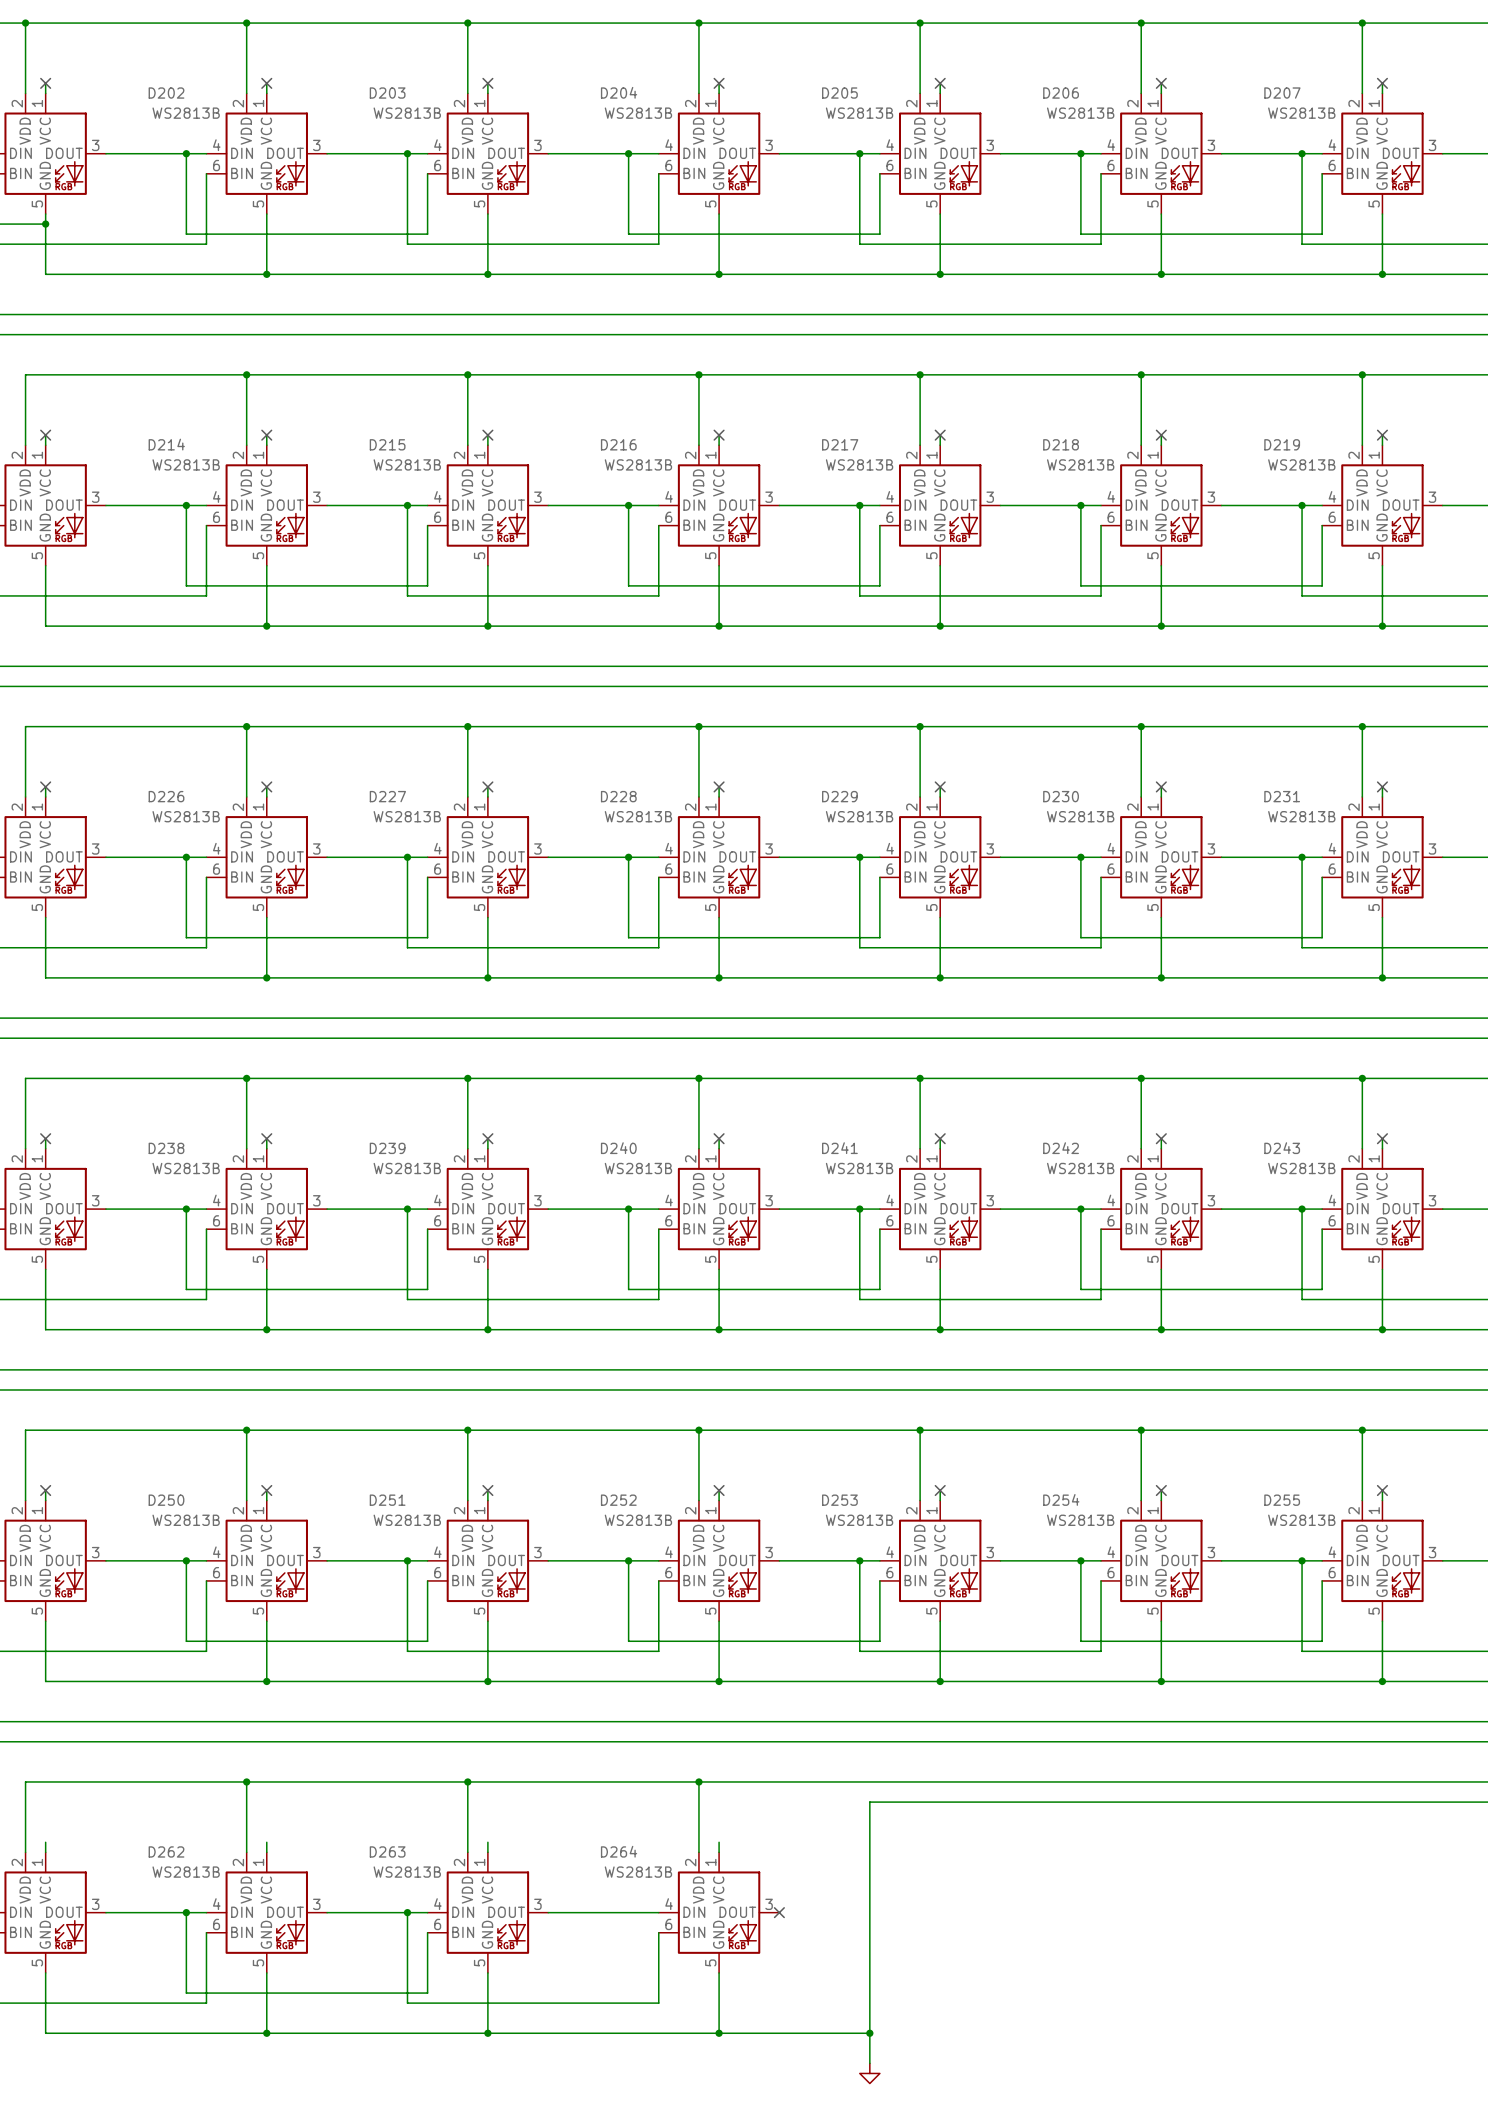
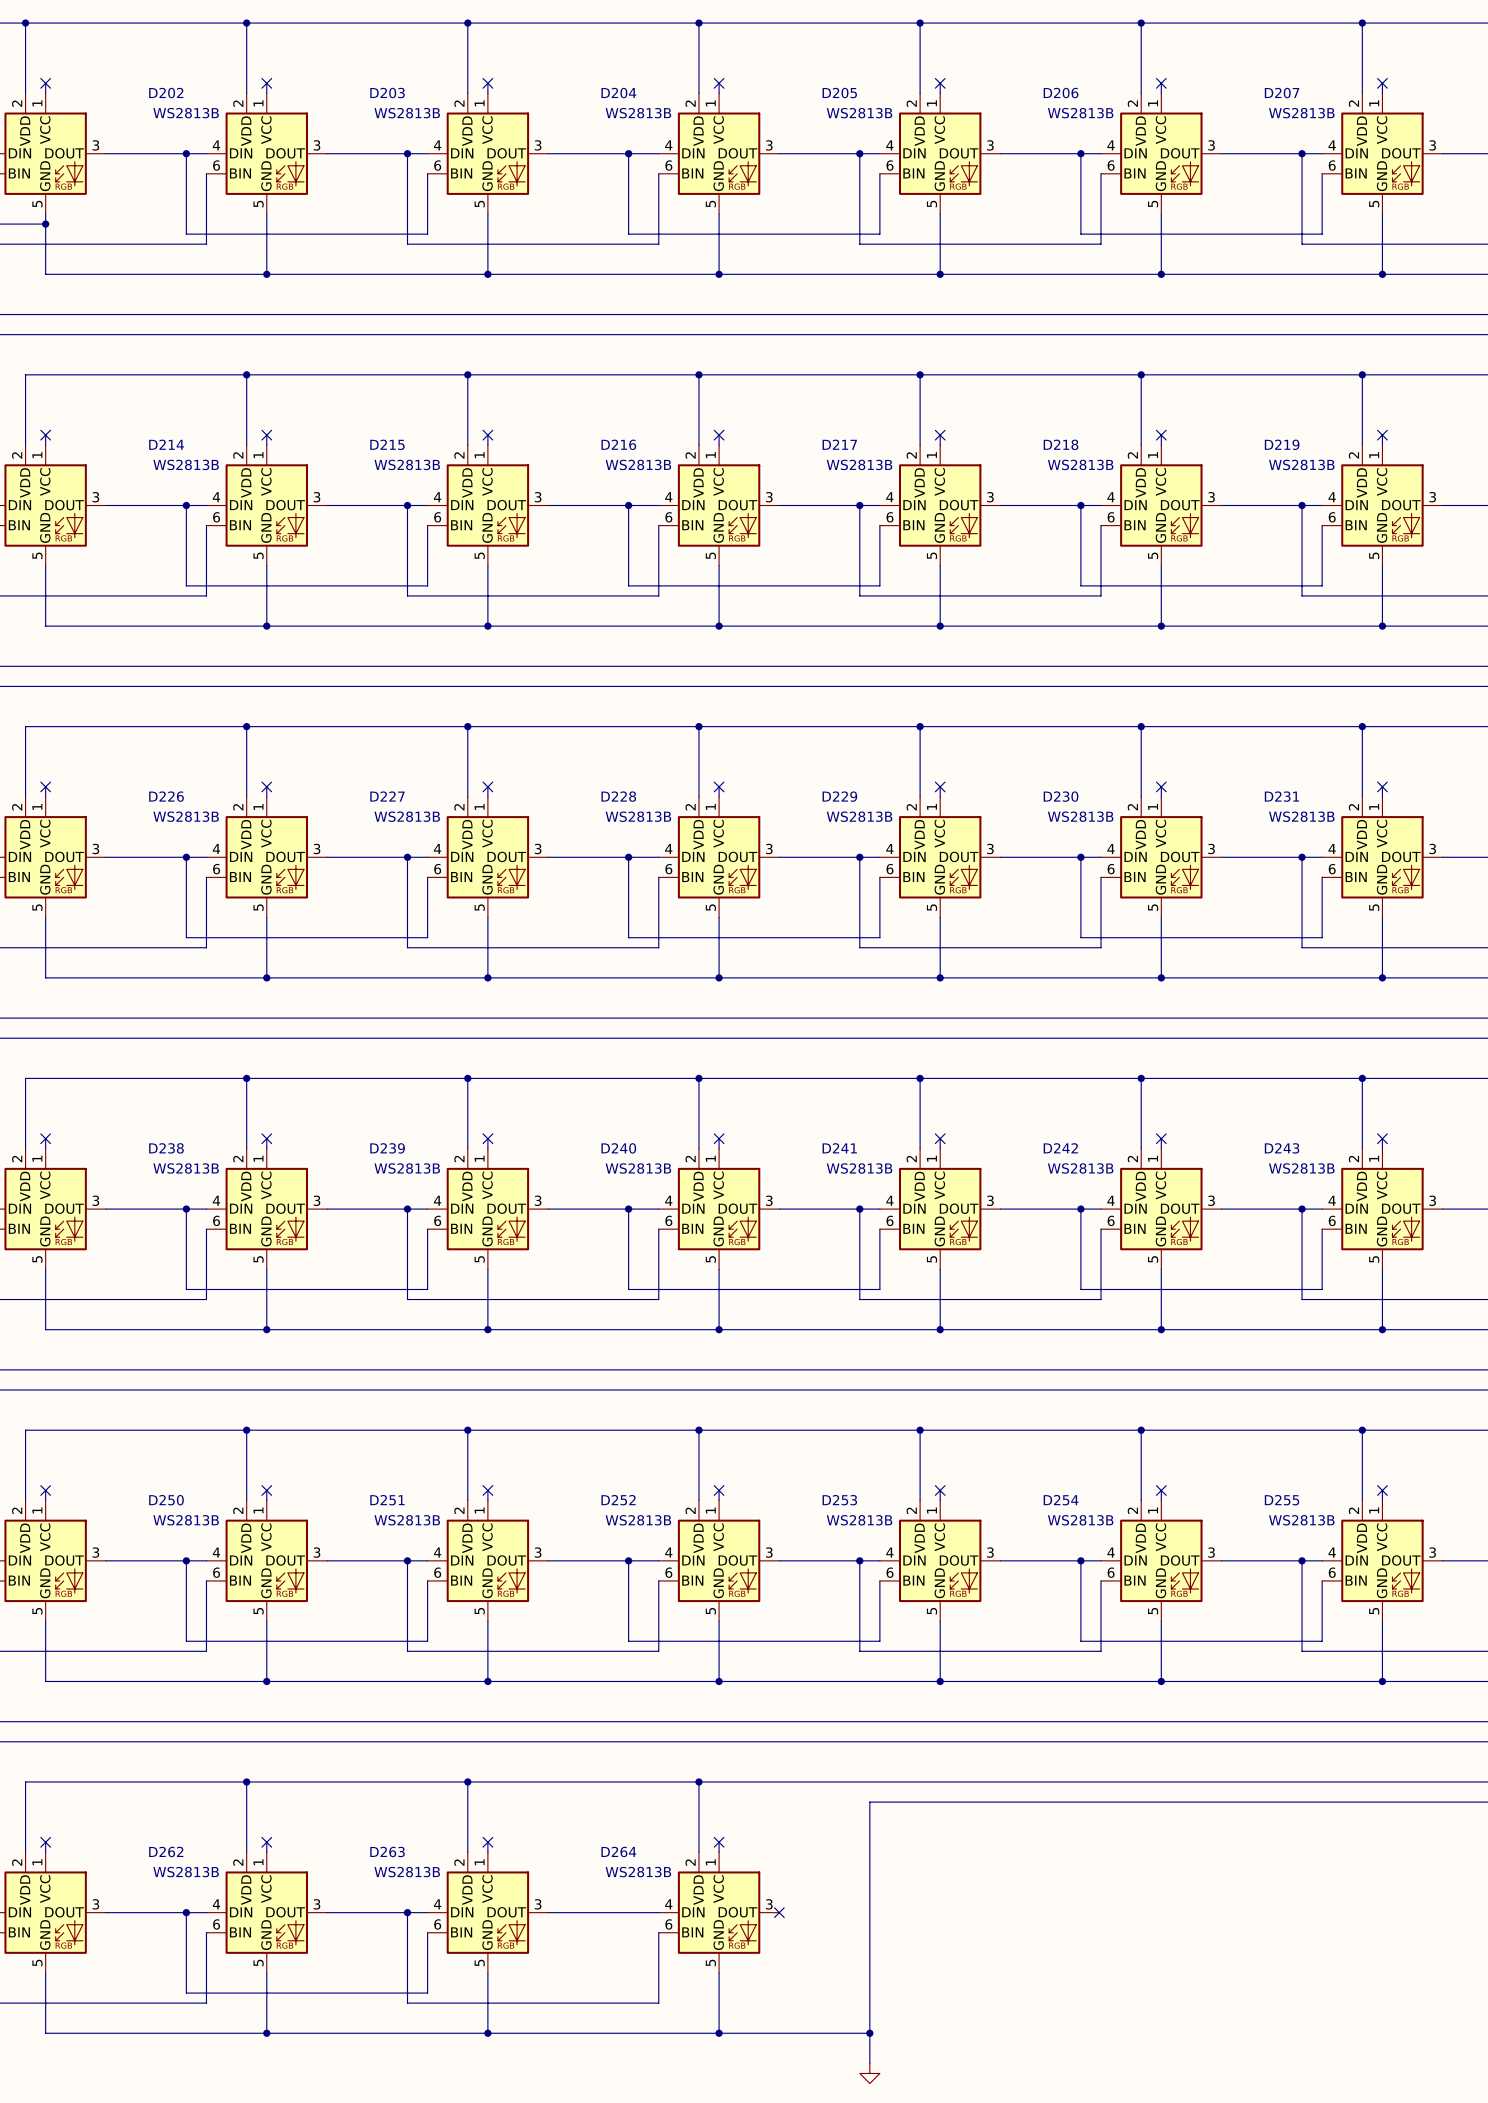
no-connect mark: none -> (45, 1842)
no-connect mark: none -> (266, 1842)
no-connect mark: none -> (487, 1842)
no-connect mark: none -> (719, 1842)

